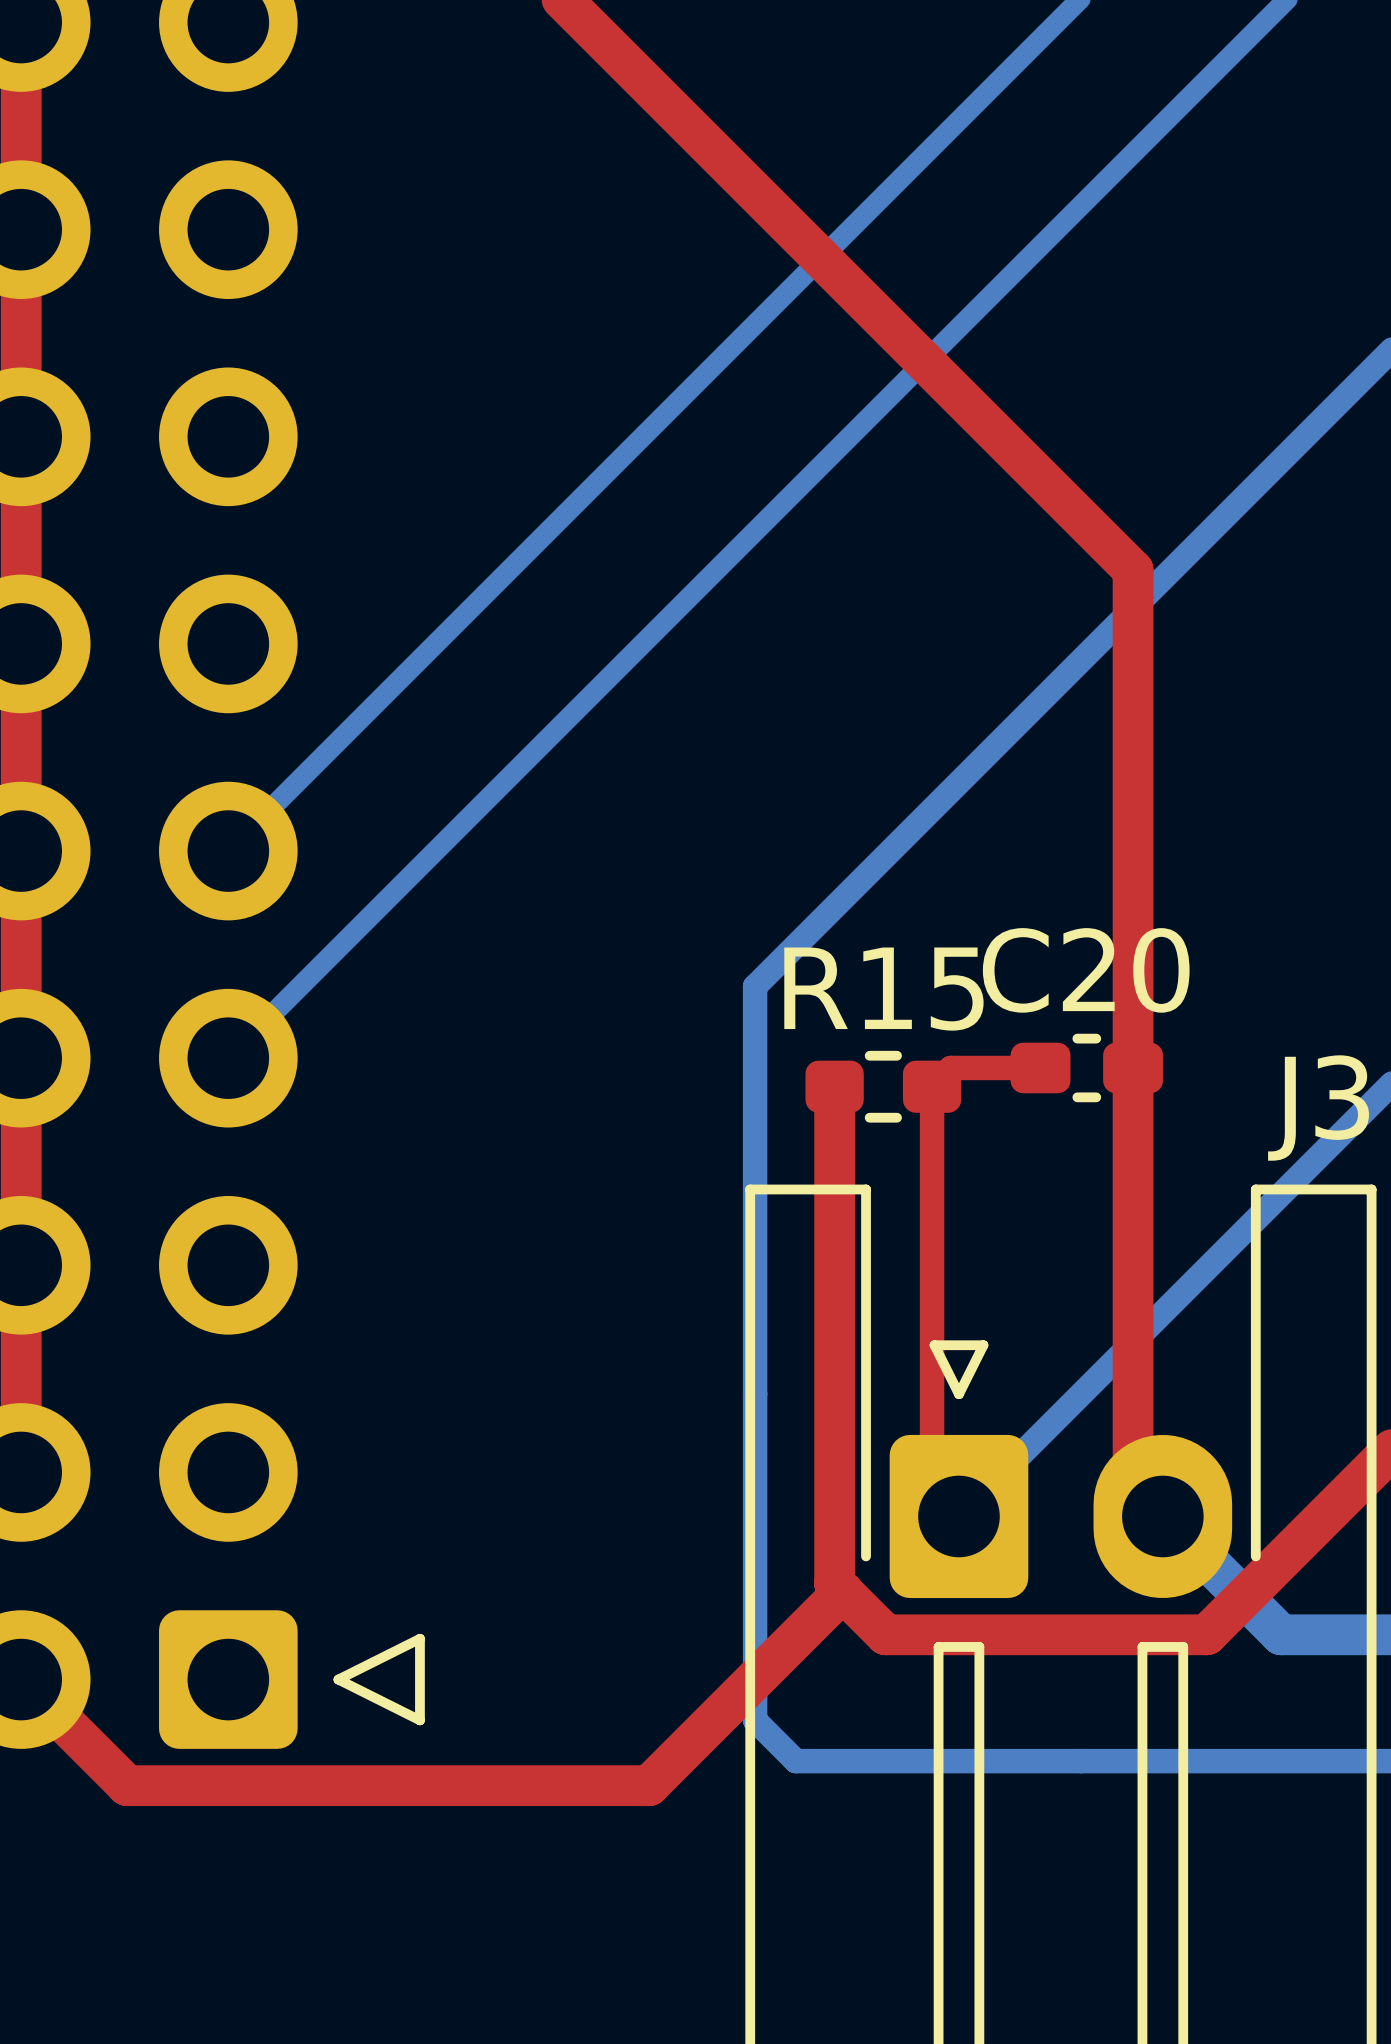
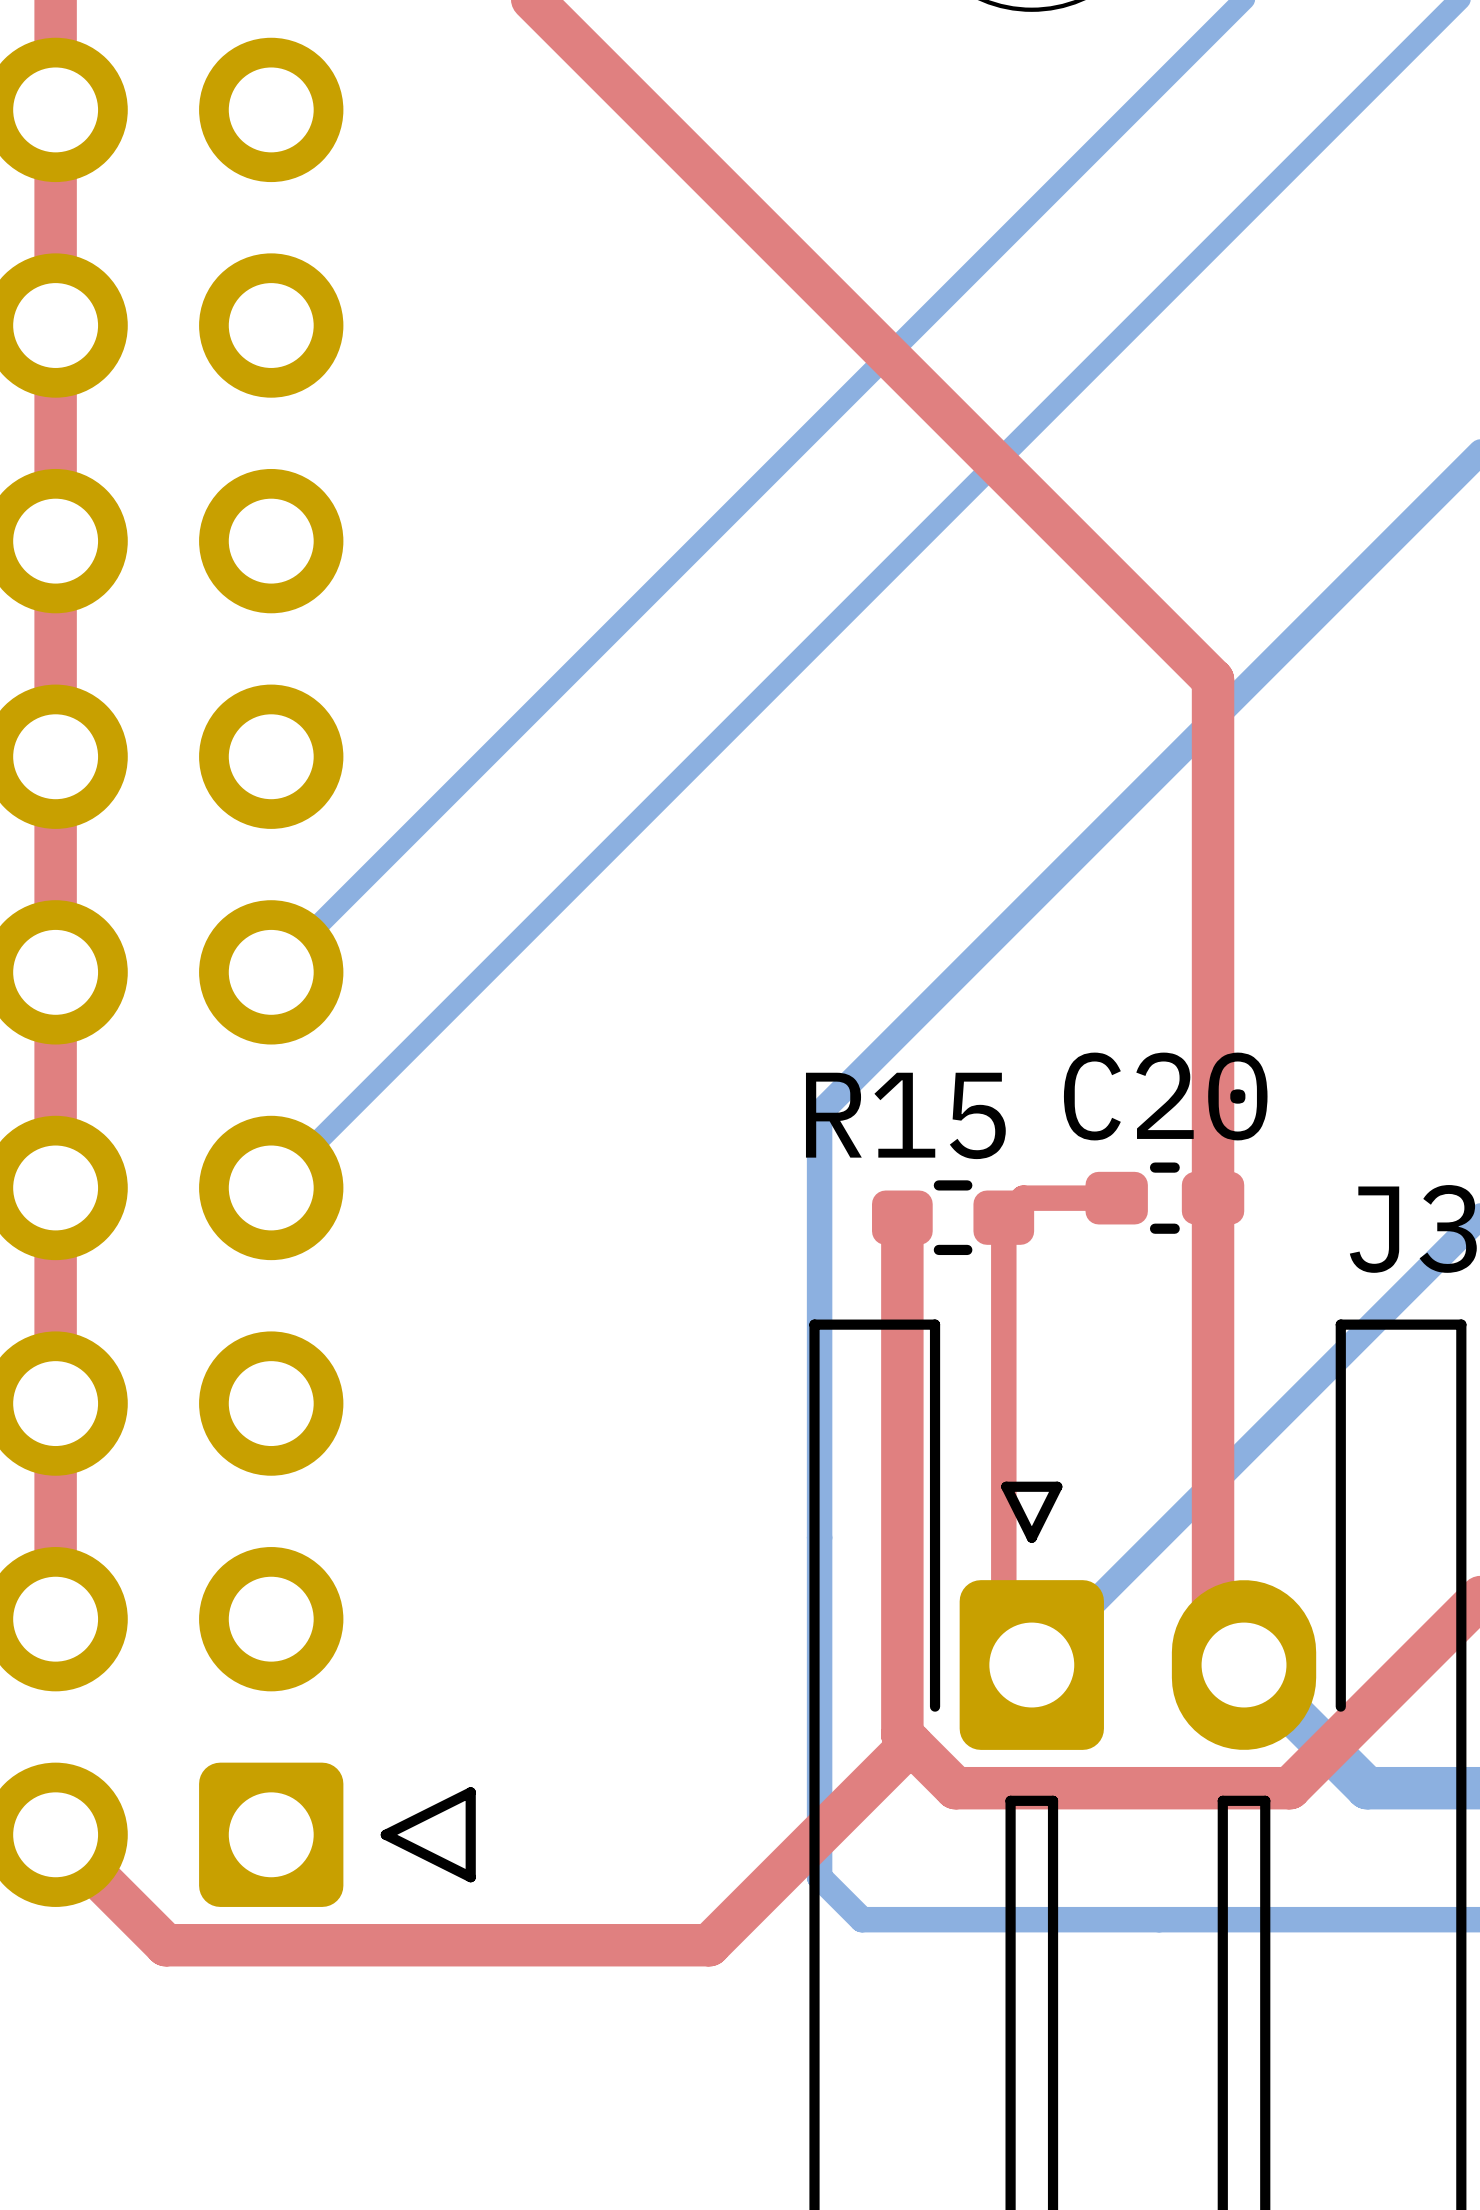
R15 name position: R15 (883, 989) -> R15 (905, 1115)

